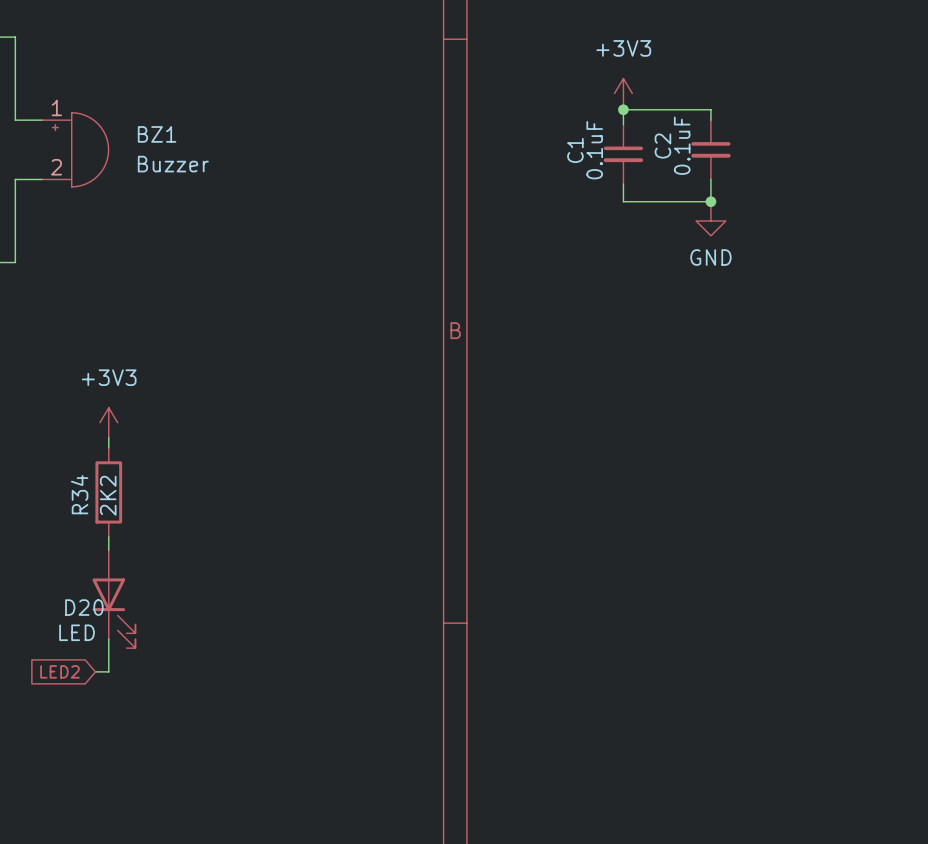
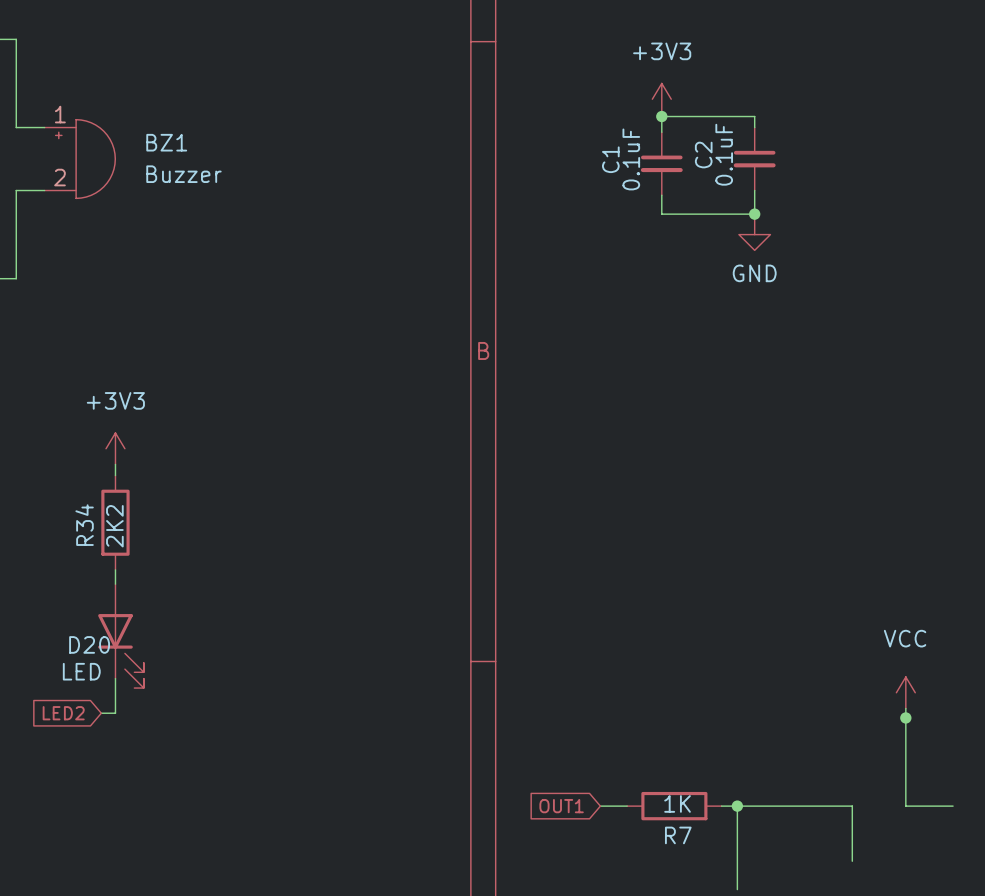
power symbol: none -> VCC (905, 692)
wire: none -> (905, 708) (905, 806) (953, 806)
junction: none -> (905, 717)
global label: none -> OUT1 (561, 806)
wire: none -> (600, 806) (627, 806)
R7: none -> 1K (674, 806)
wire: none -> (721, 806) (852, 806) (852, 861)
wire: none -> (737, 806) (737, 889)
junction: none -> (737, 806)

